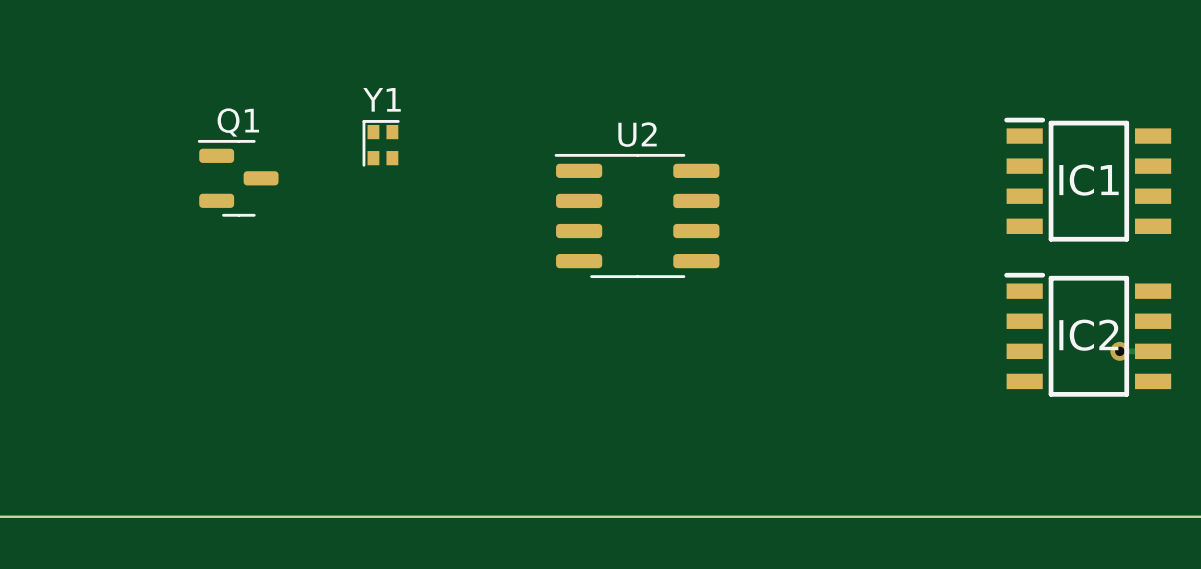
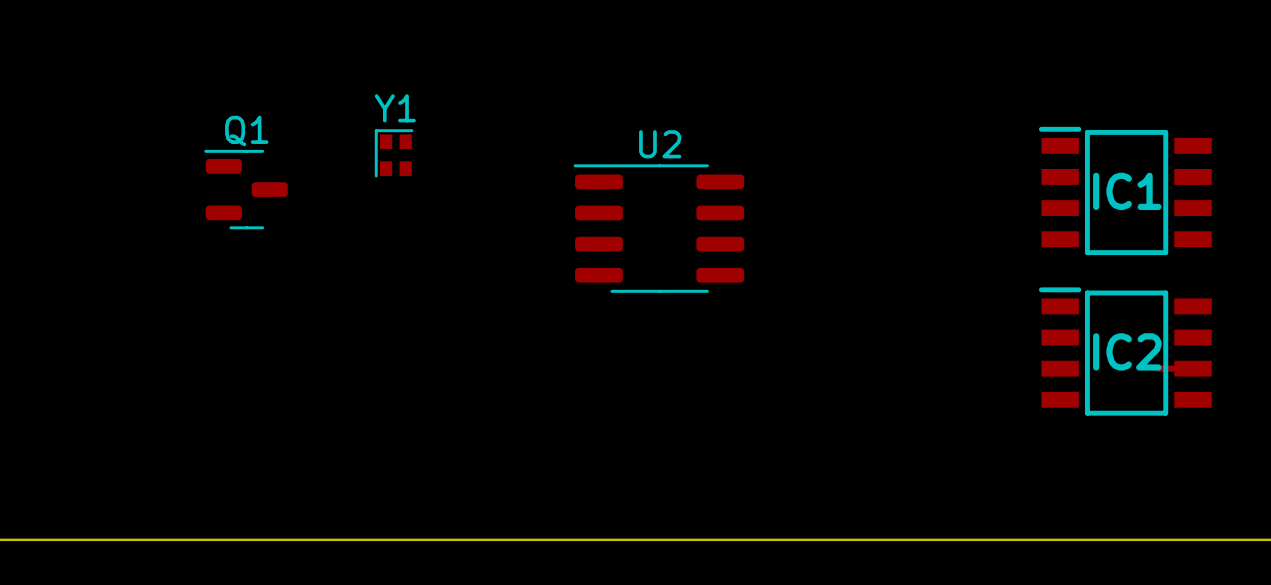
via: (1119, 351) -> none

